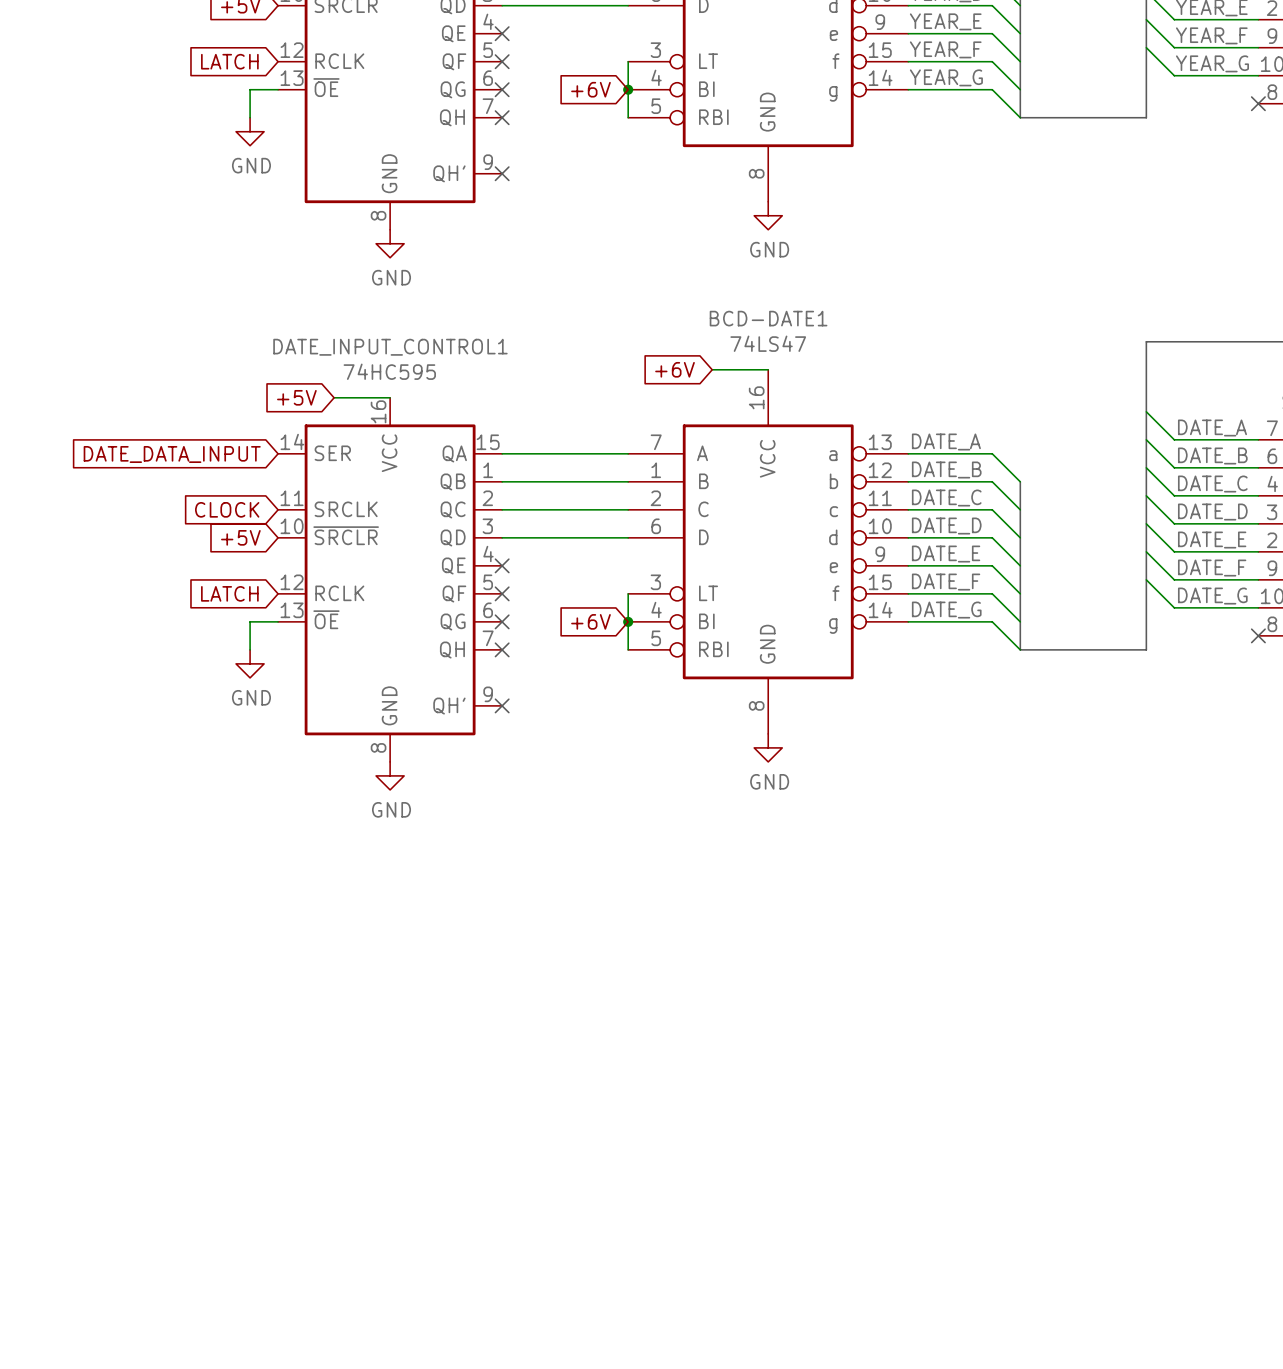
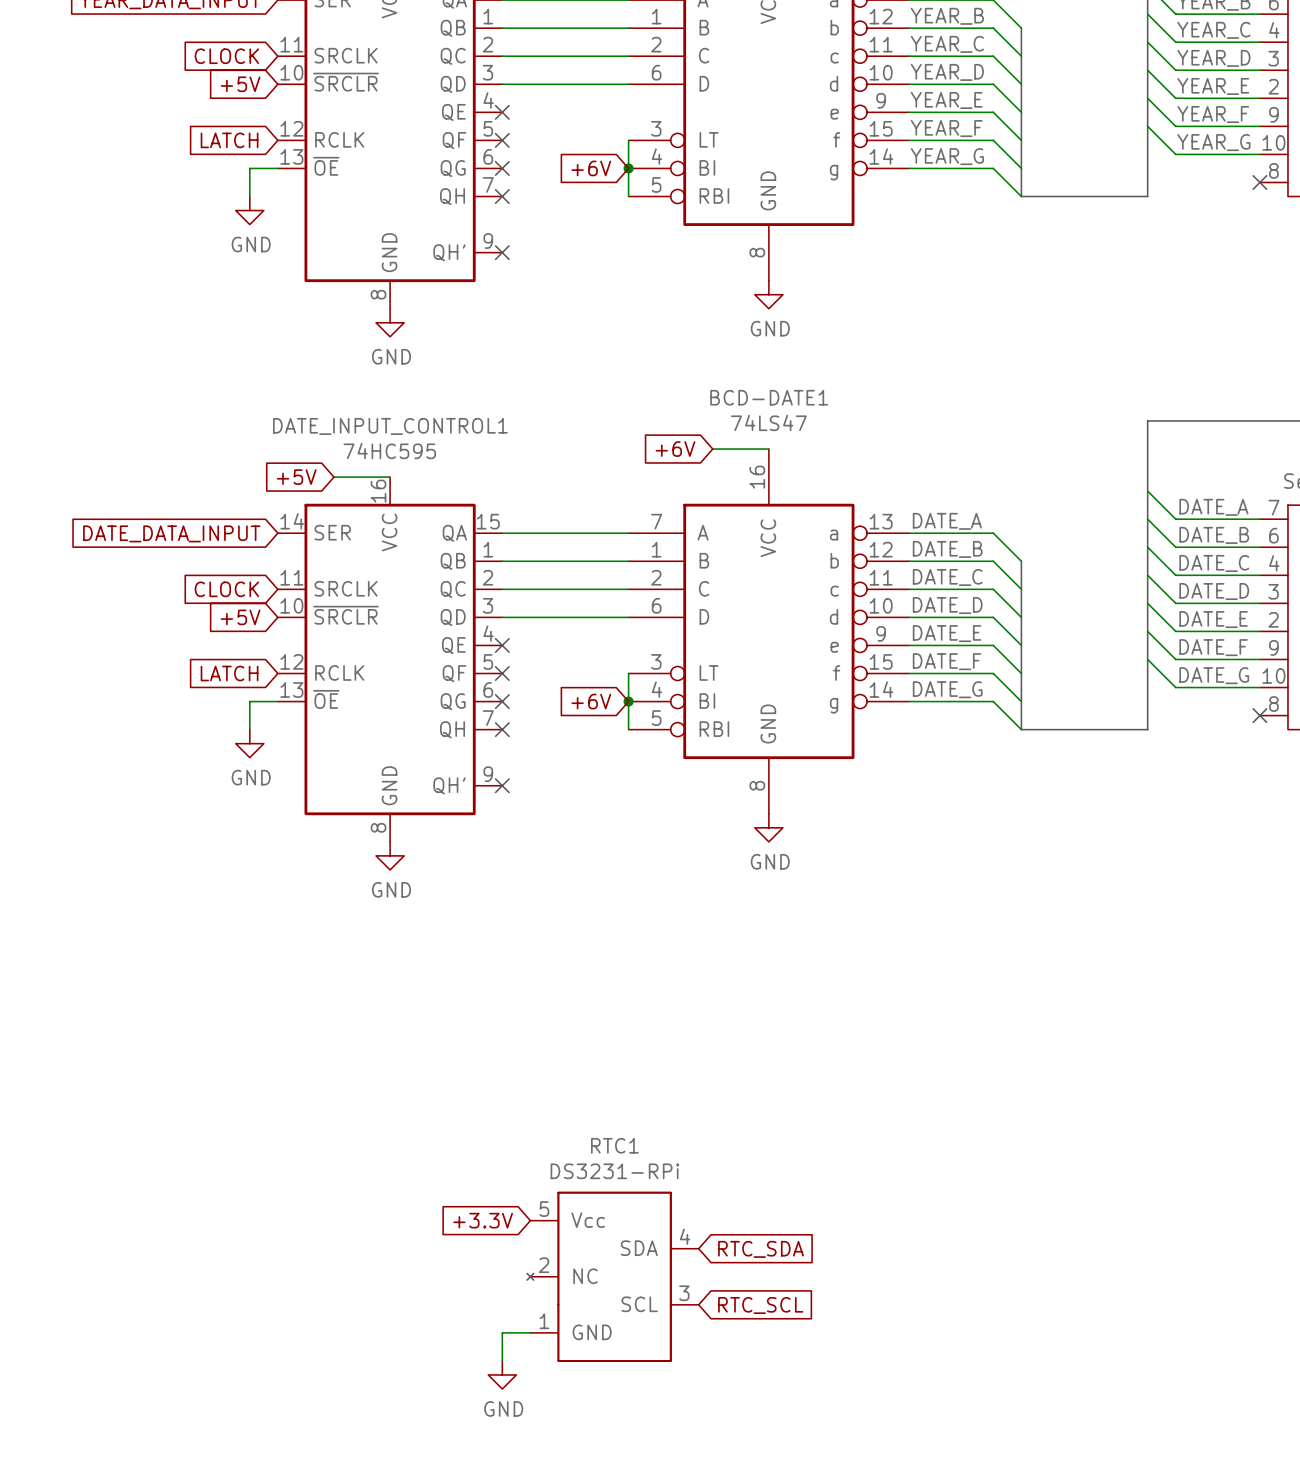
global label: none -> +3.3V (483, 1220)
global label: none -> RTC_SDA (761, 1249)
RTC1: none -> DS3231-RPi (612, 1276)
global label: none -> RTC_SCL (760, 1305)
wire: none -> (530, 1332) (502, 1332) (502, 1360)
power symbol: none -> GND (502, 1374)

